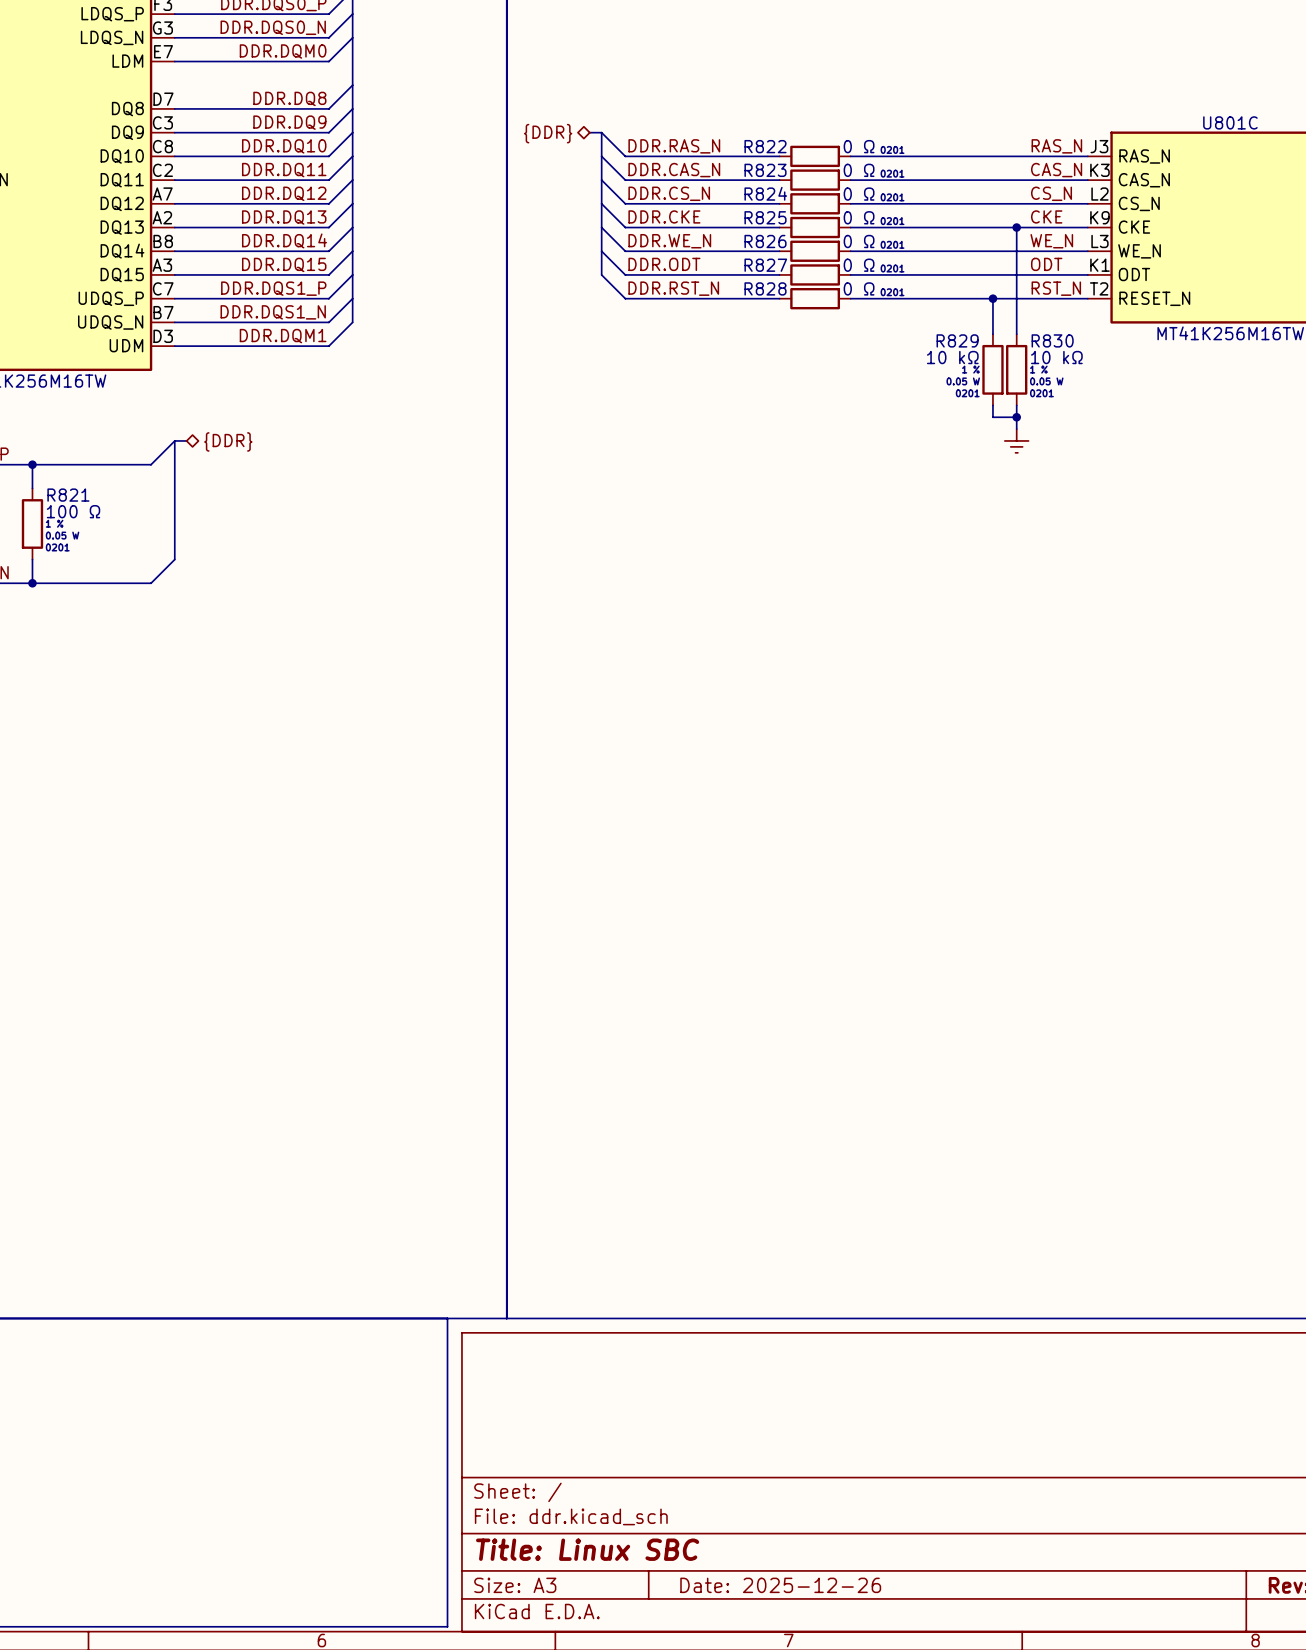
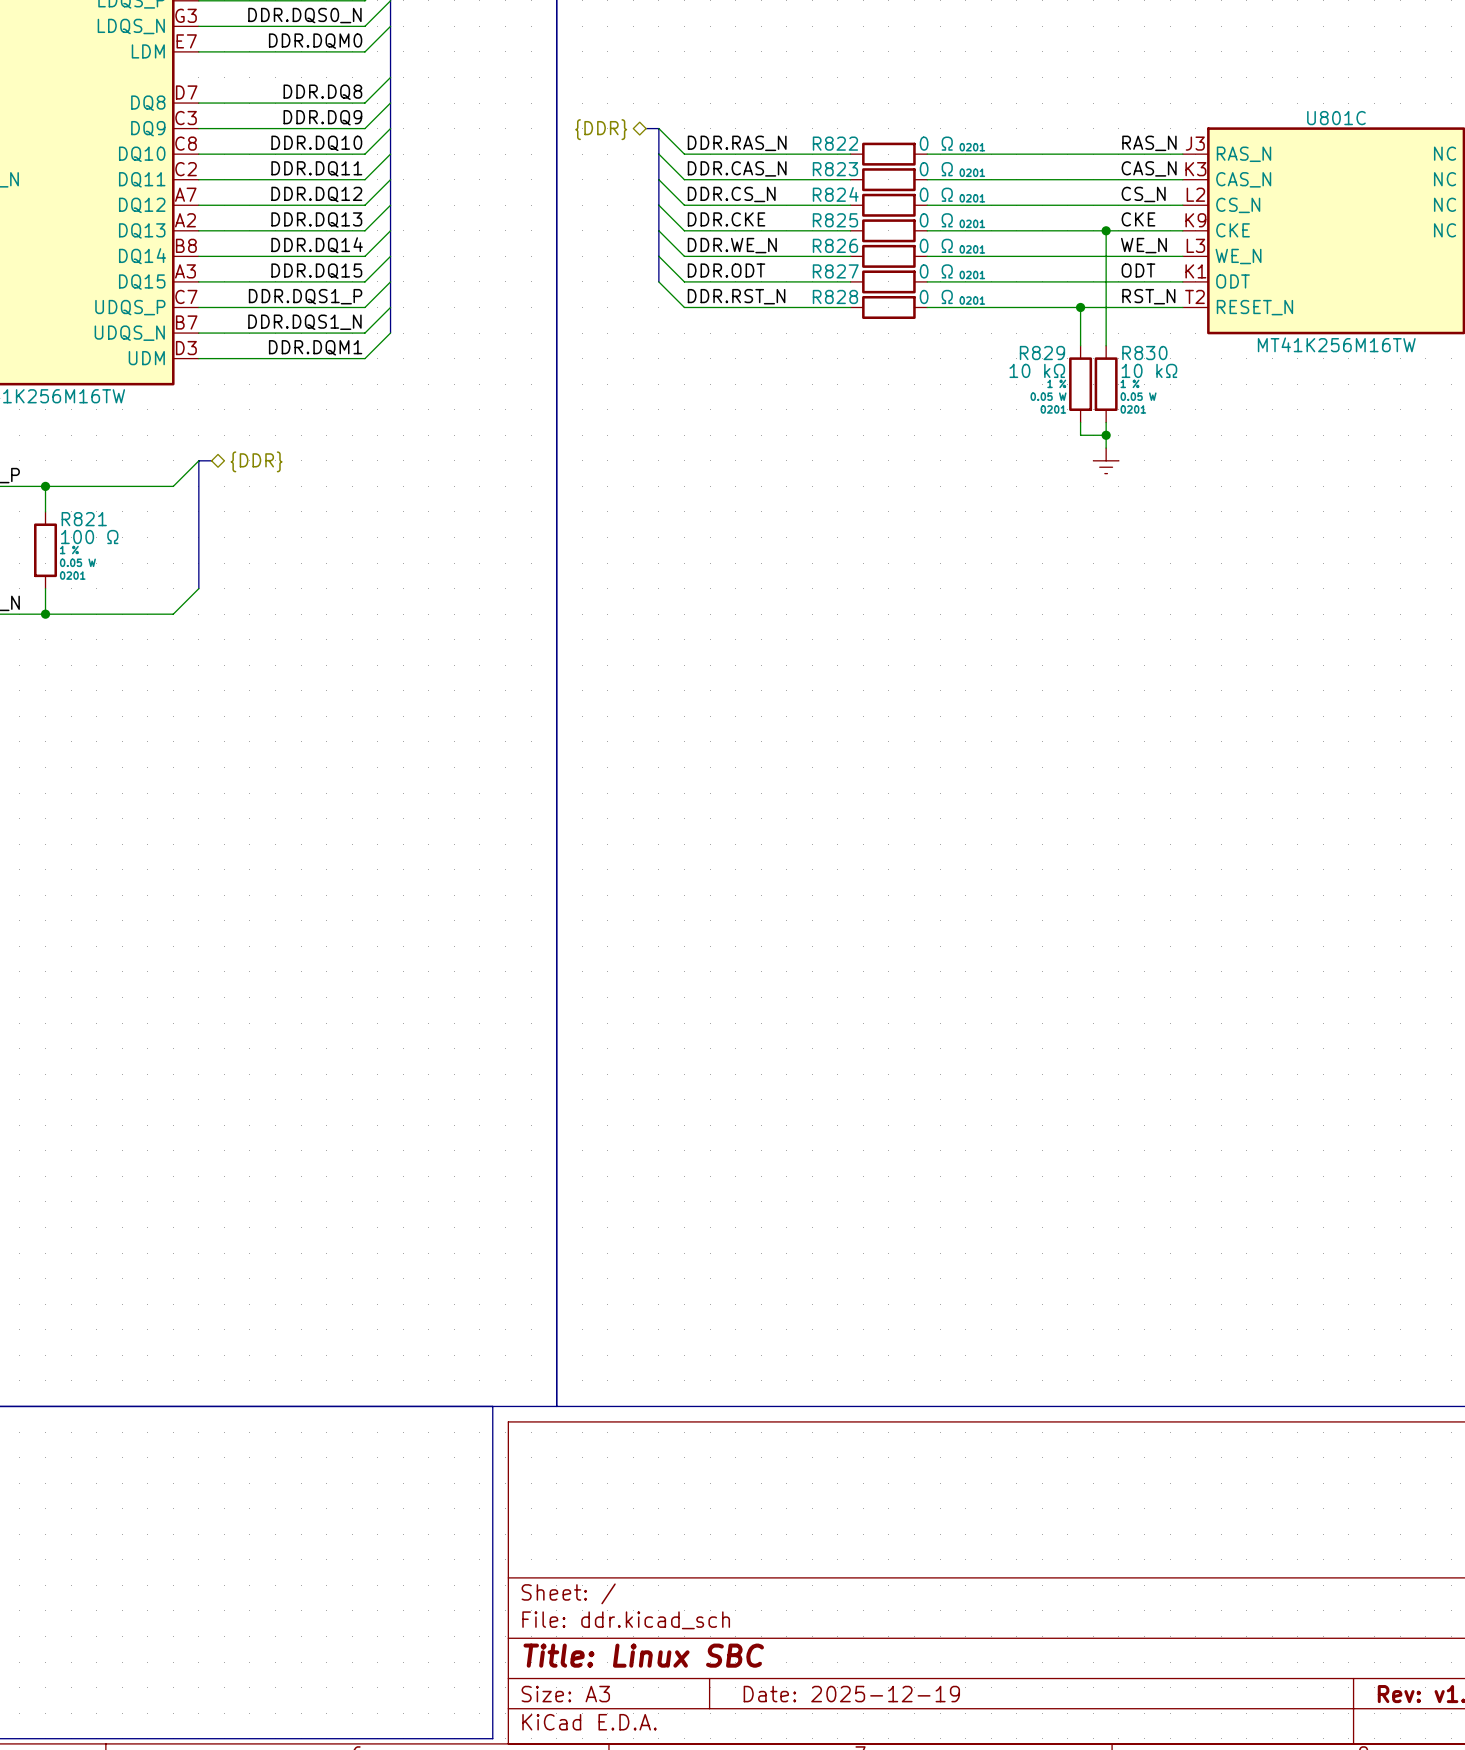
title block: Date: 2025-12-26 (780, 1585) -> Date: 2025-12-19 (851, 1694)

